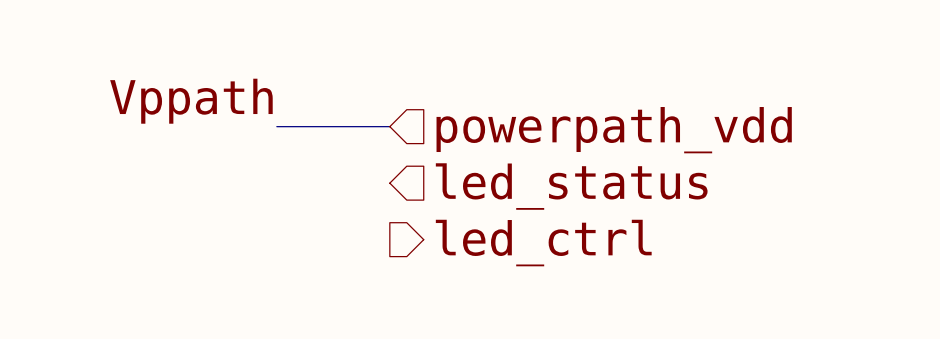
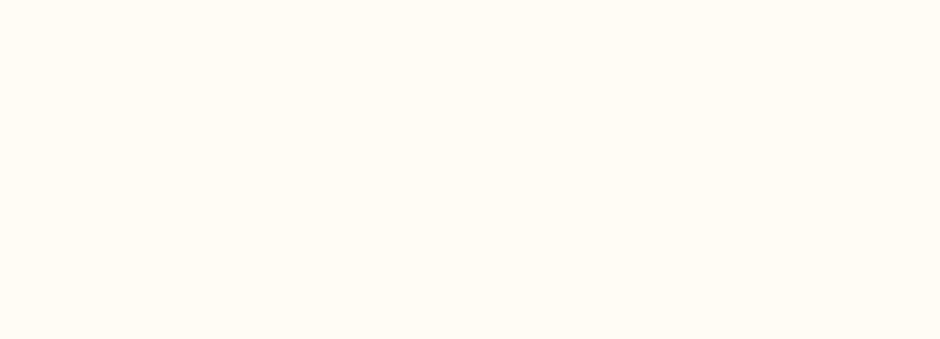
label: Vppath (191, 101) -> none
wire: (276, 126) (389, 126) -> none
hierarchical label: powerpath_vdd (614, 130) -> none
hierarchical label: led_status (571, 186) -> none
hierarchical label: led_ctrl (543, 243) -> none

